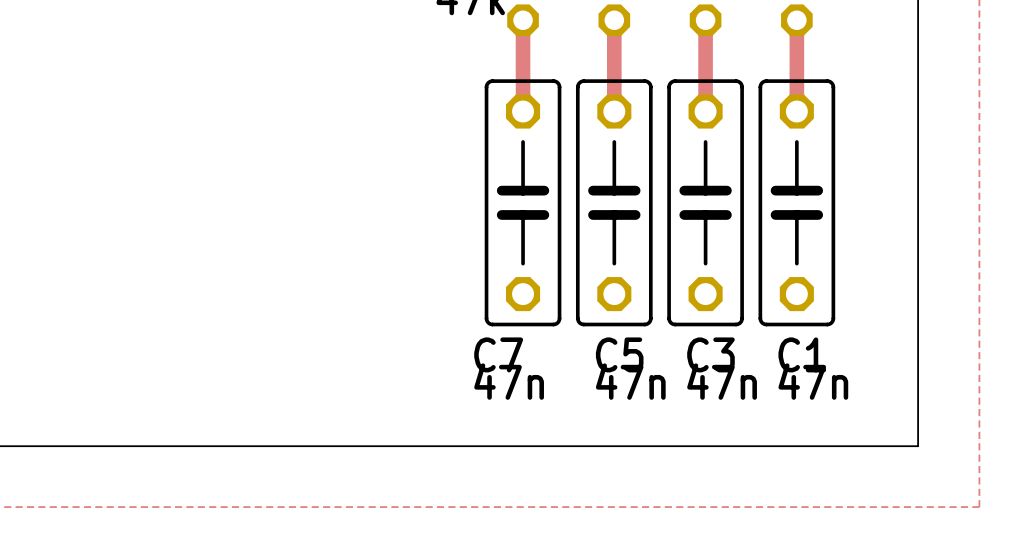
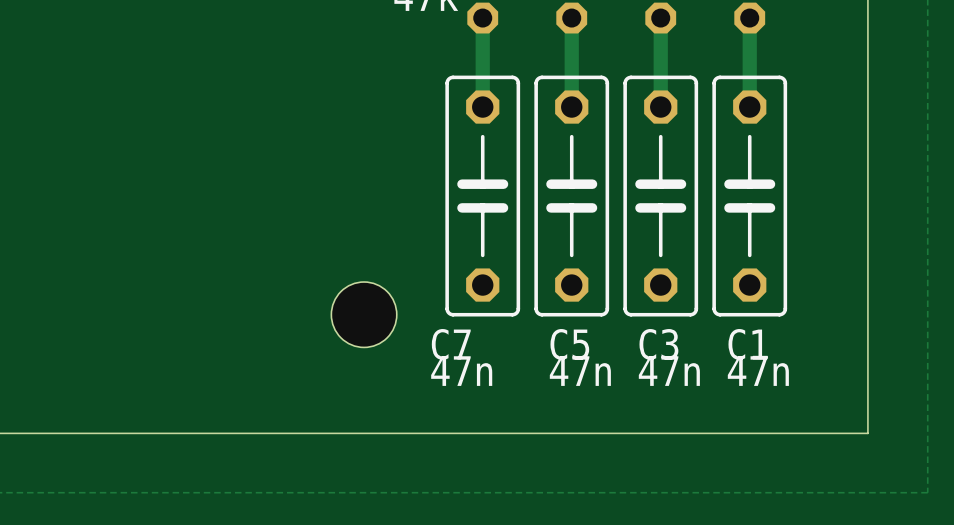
hole: none -> (364, 314)

